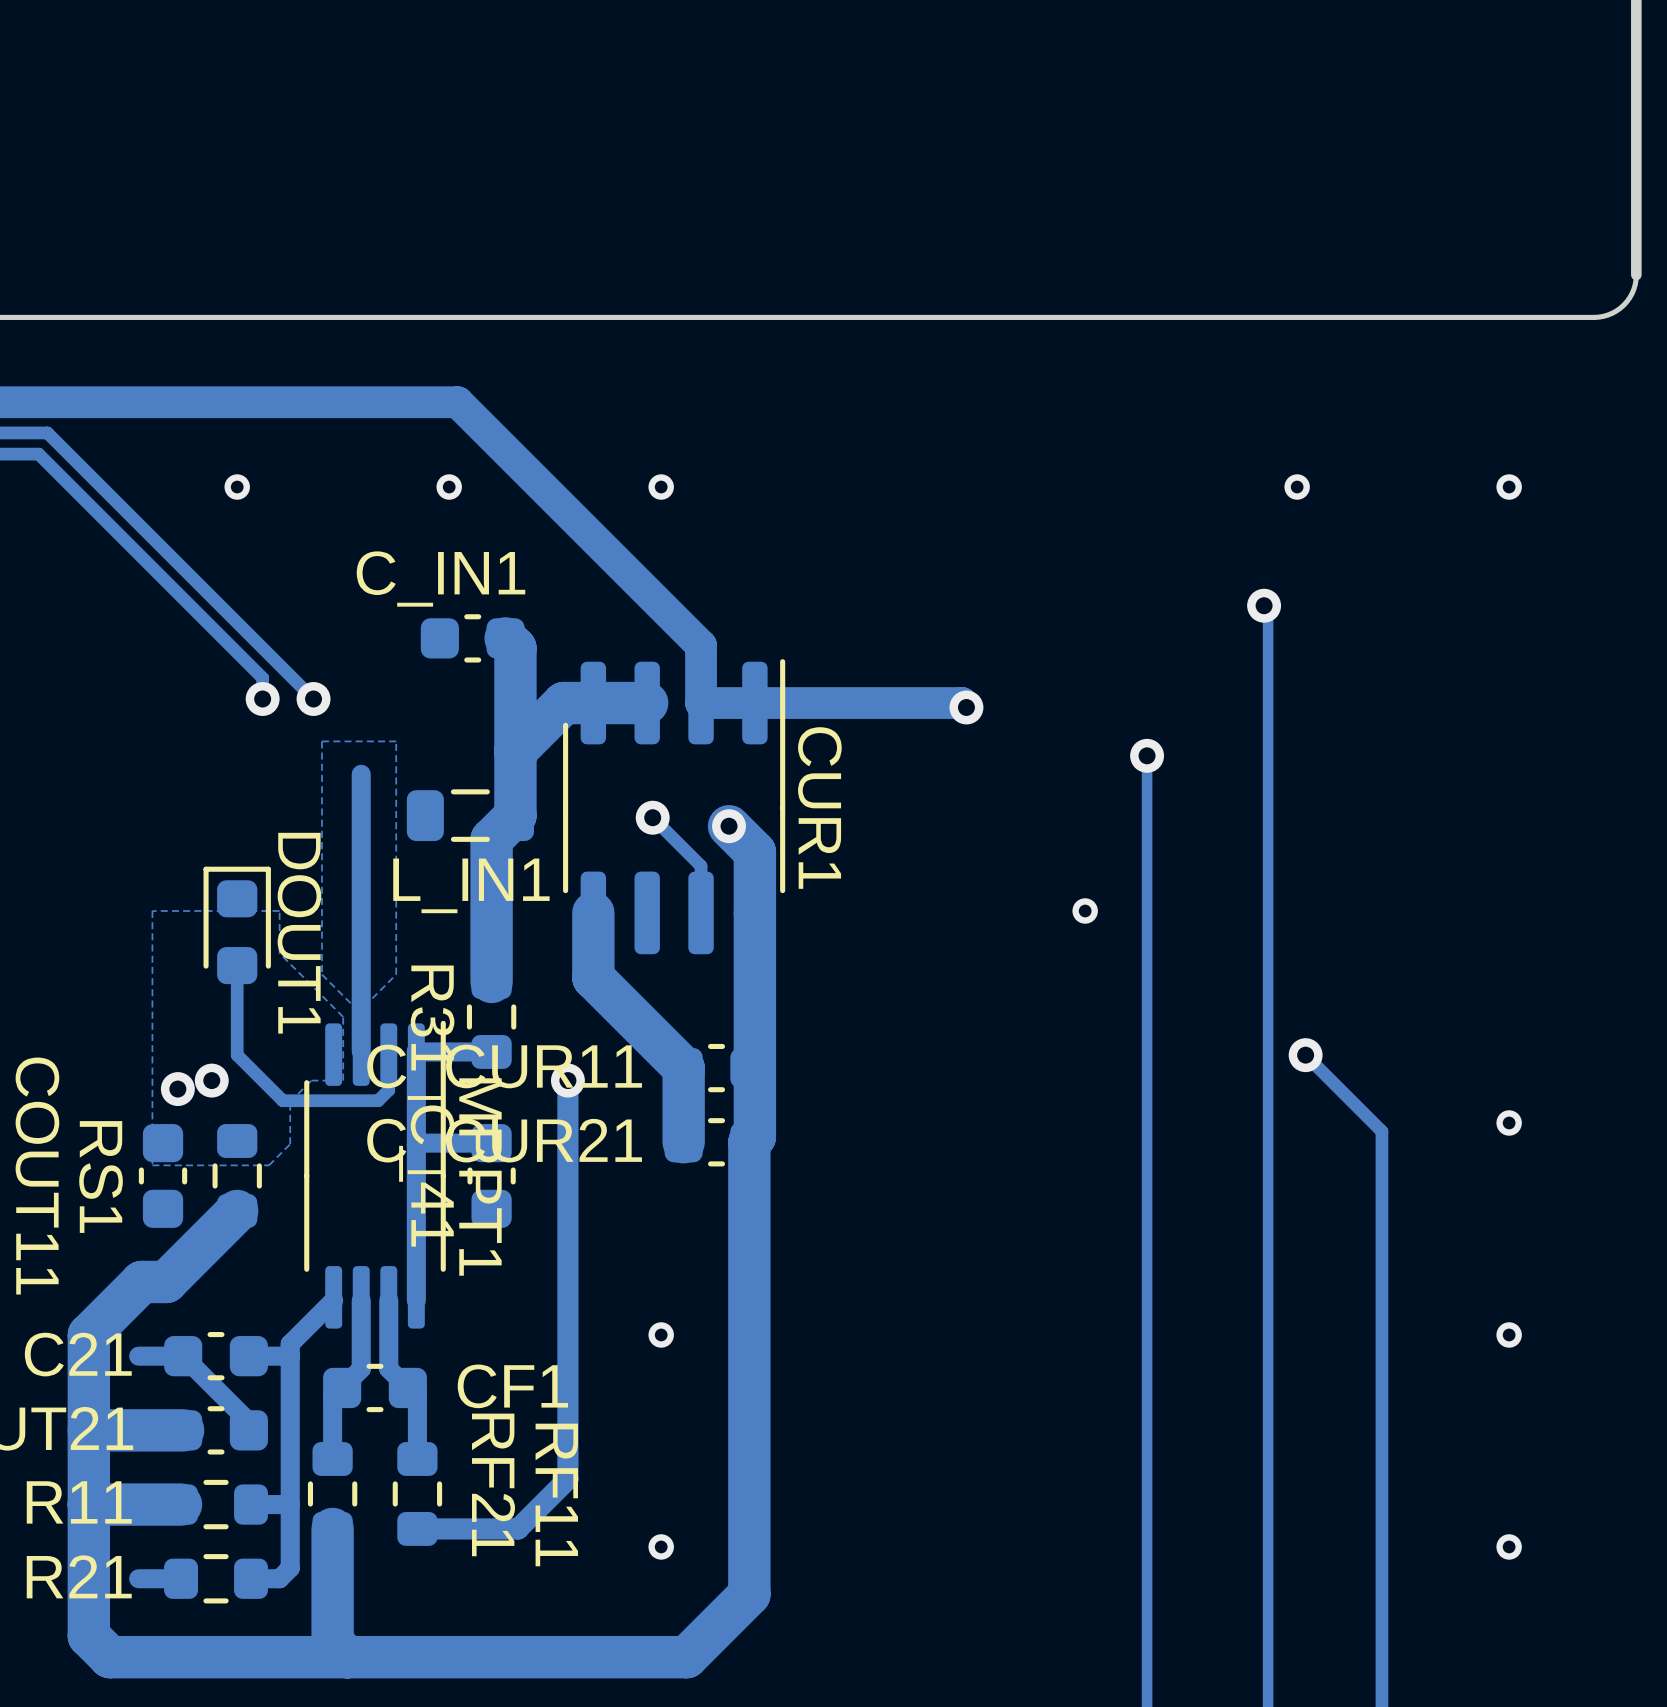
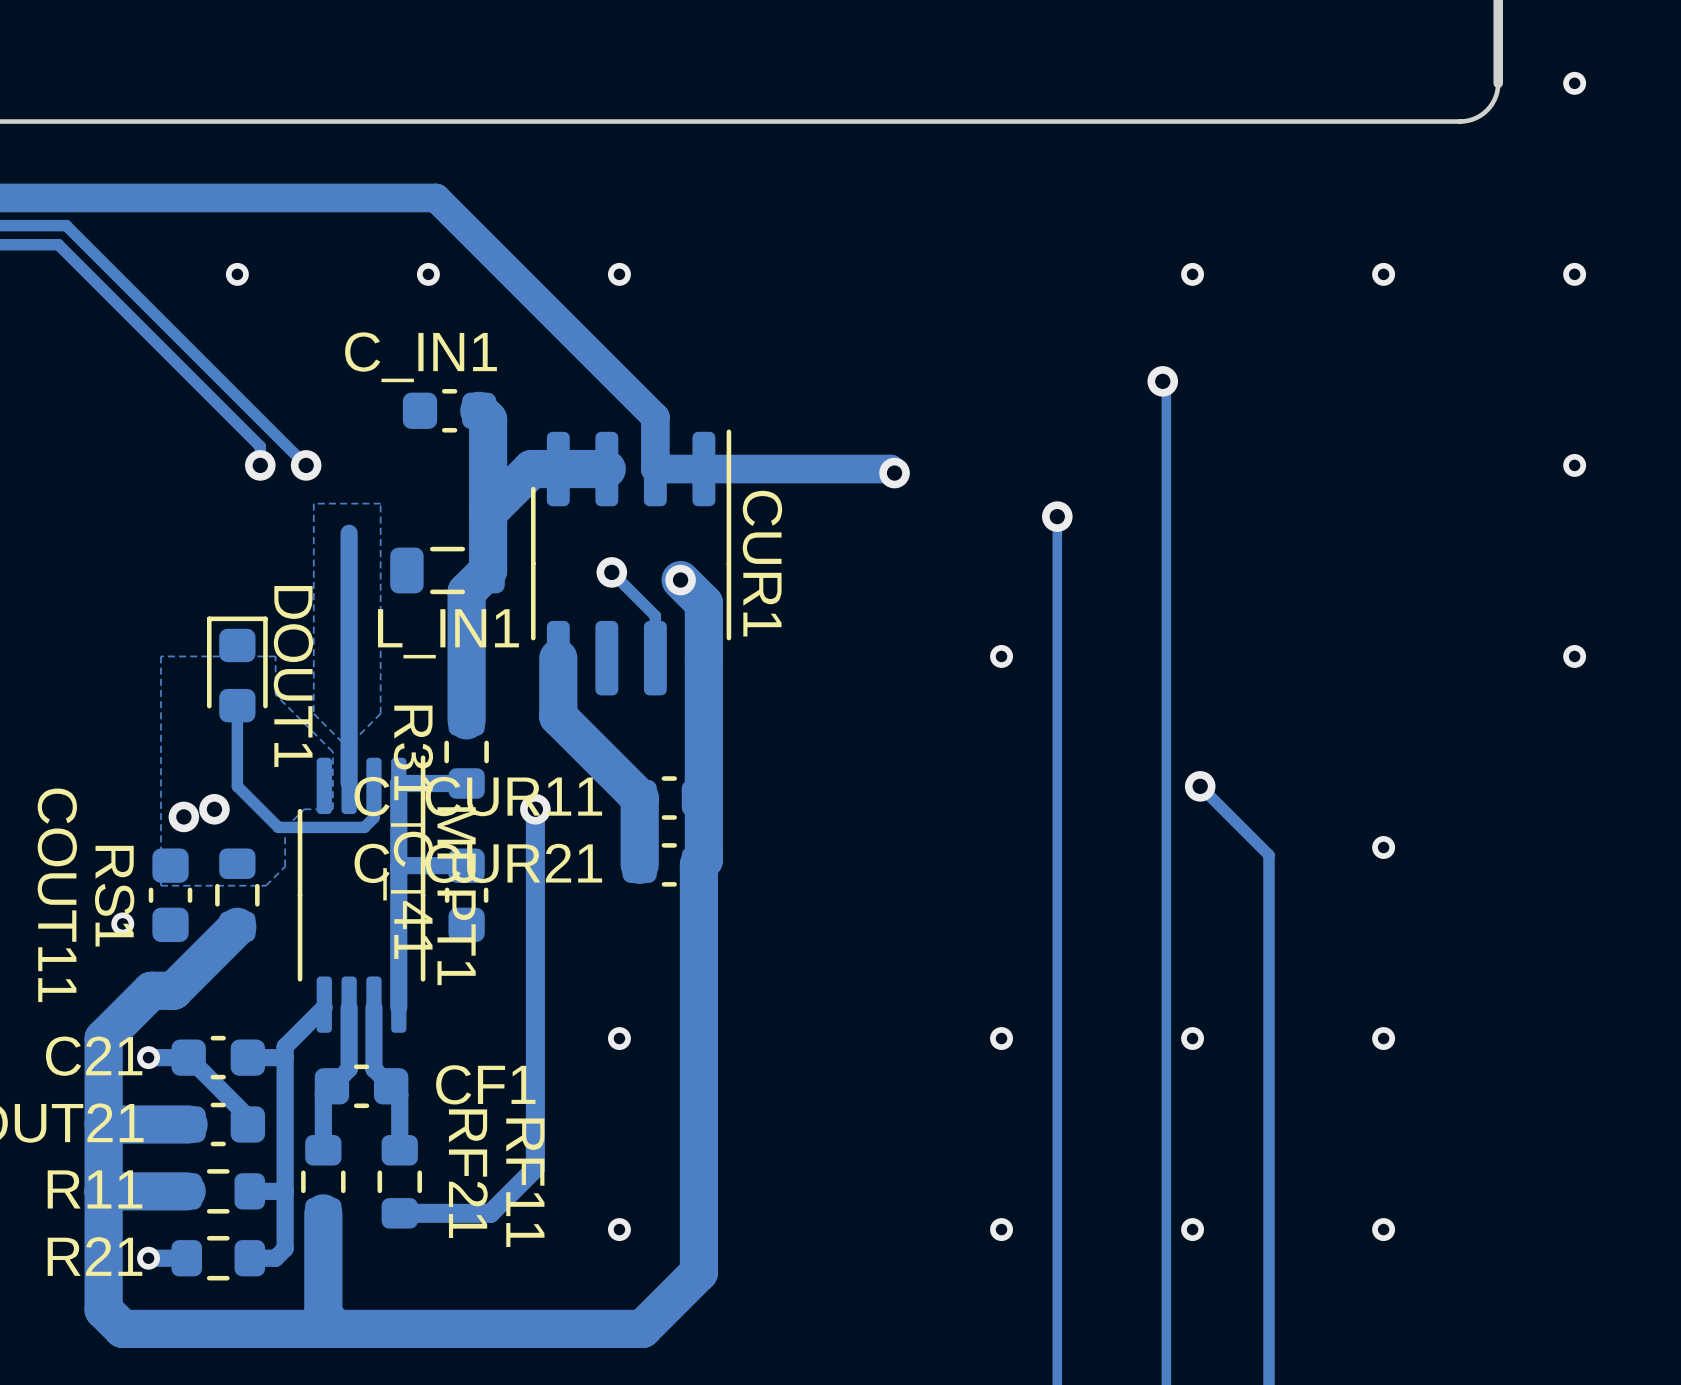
via: none -> (122, 923)
via: none -> (1001, 1038)
via: none -> (1192, 1038)
via: none -> (148, 1057)
via: none -> (1001, 1229)
via: none -> (1192, 1229)
via: none -> (148, 1258)

